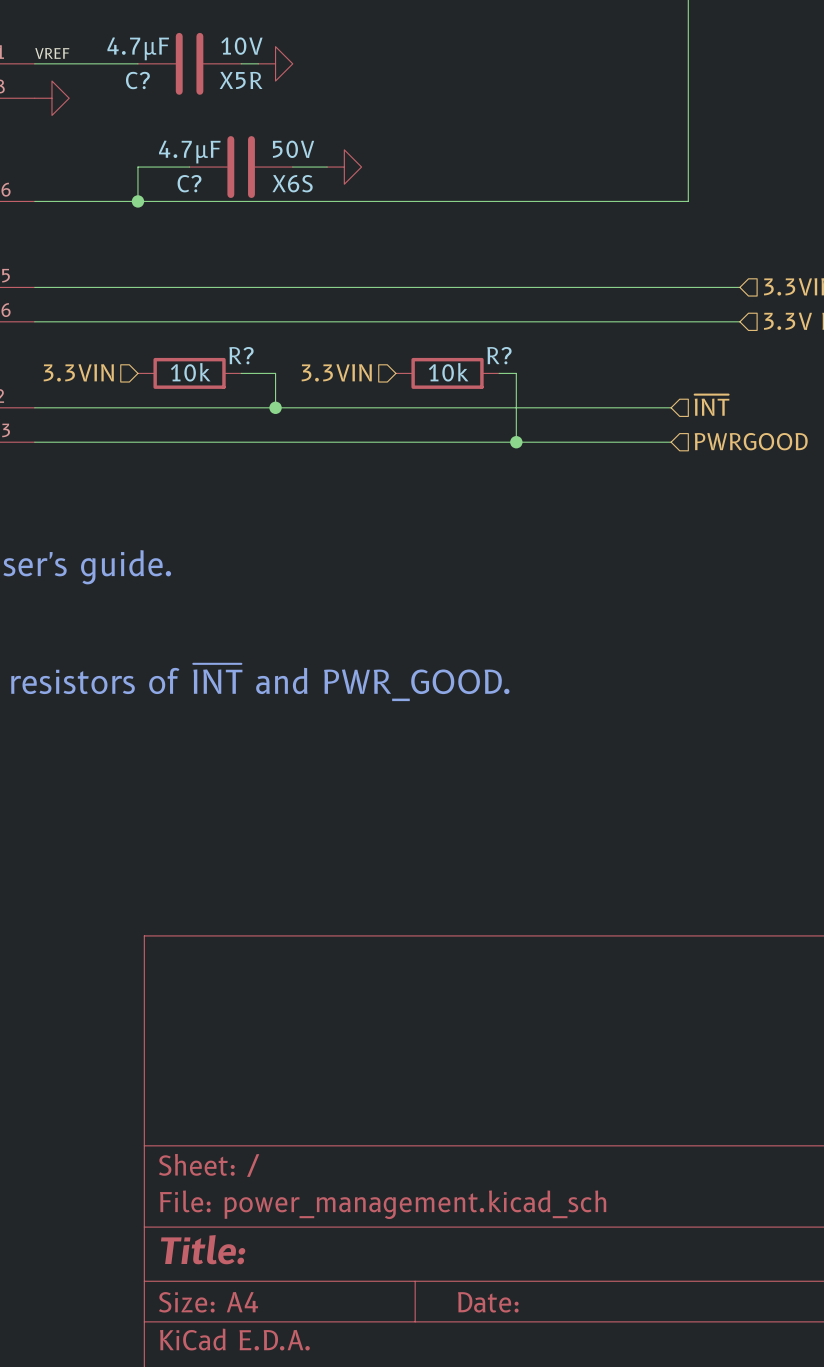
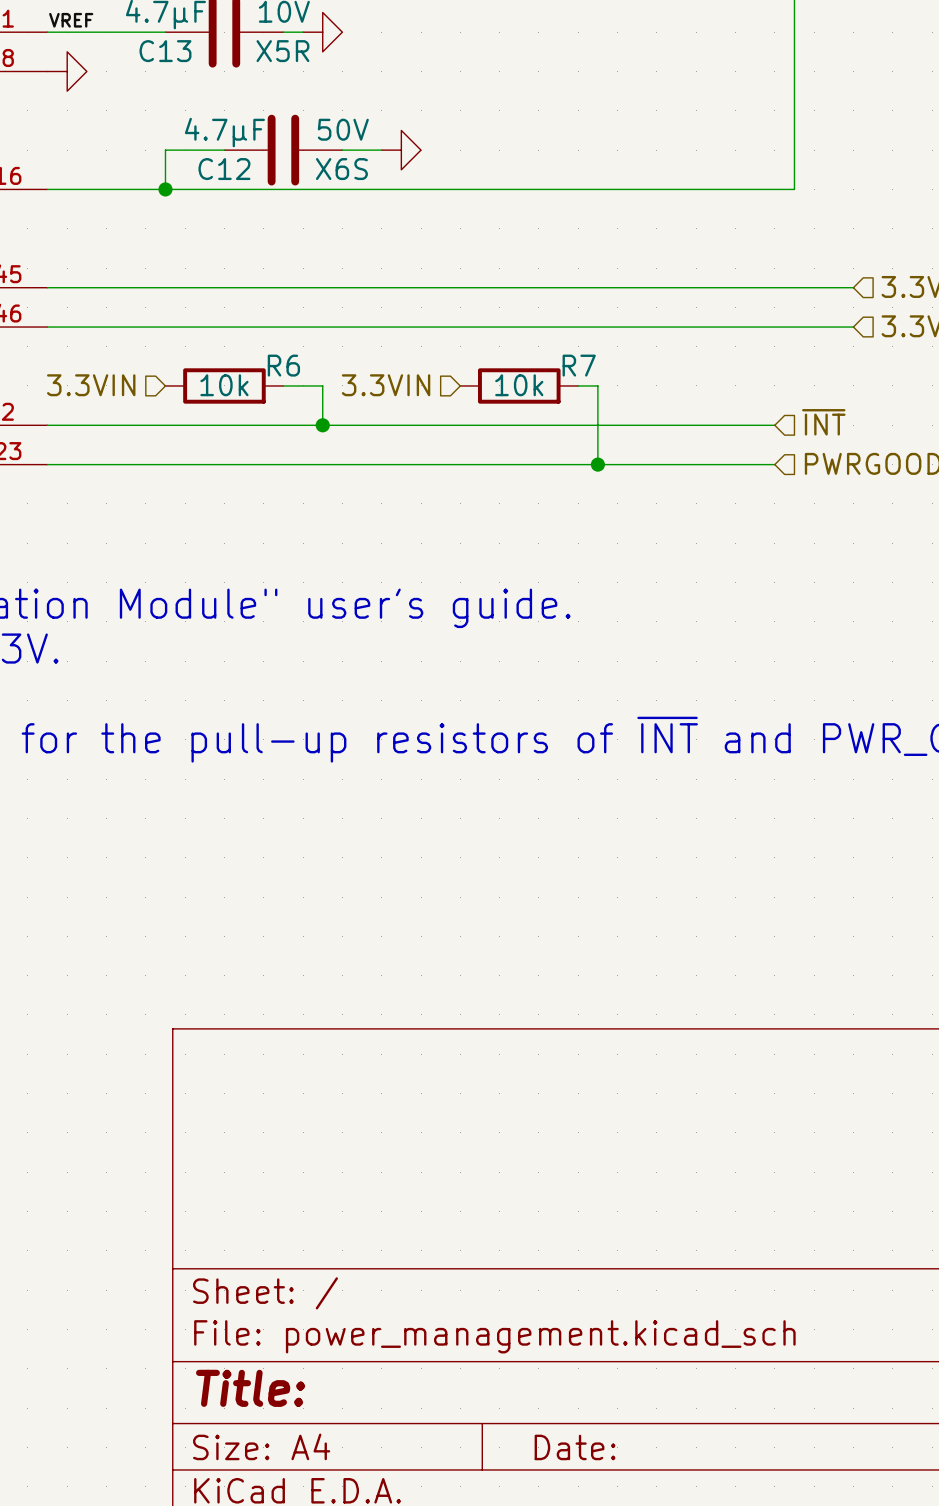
C? name: C? (137, 80) -> C13 (165, 51)
C? name: C? (189, 183) -> C12 (224, 169)
R? name: R? (241, 355) -> R6 (283, 365)
R? name: R? (499, 355) -> R7 (579, 365)

